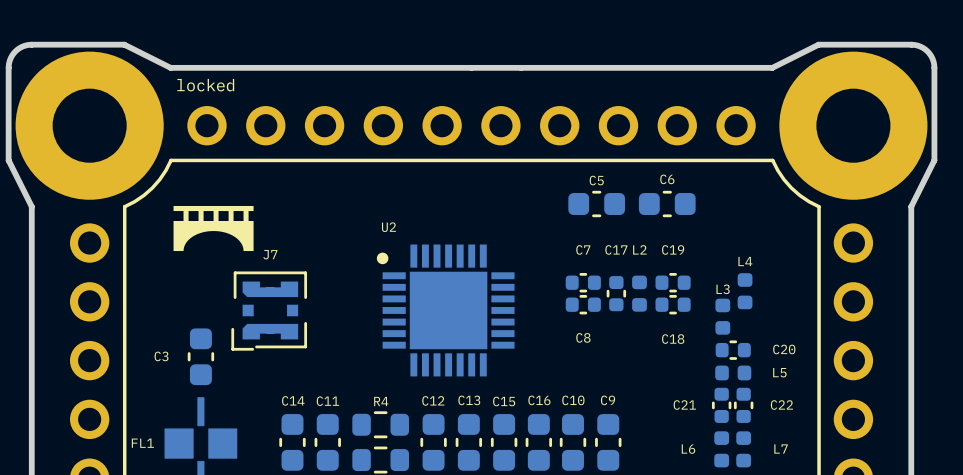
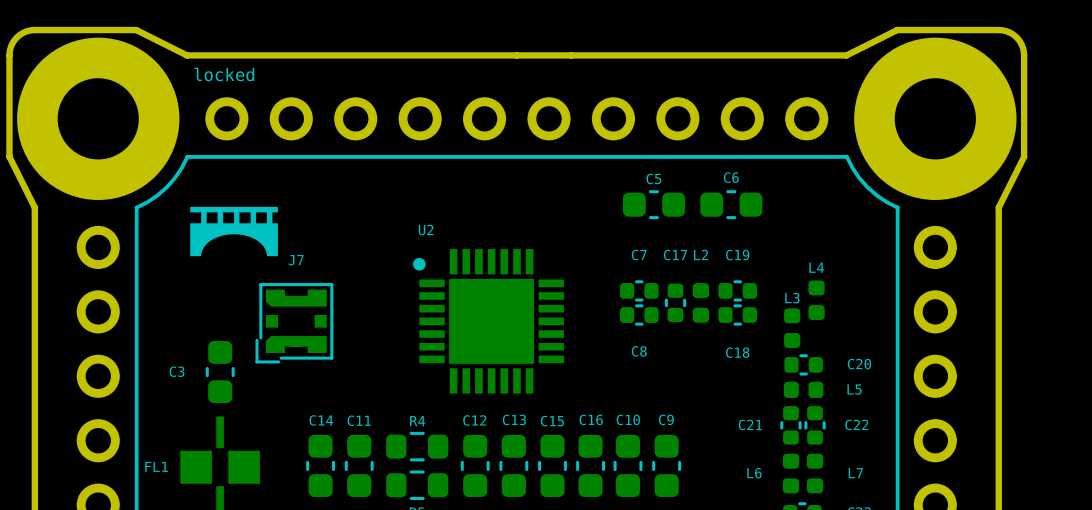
J7 footprint: [231, 271, 308, 351] -> [255, 283, 334, 364]

